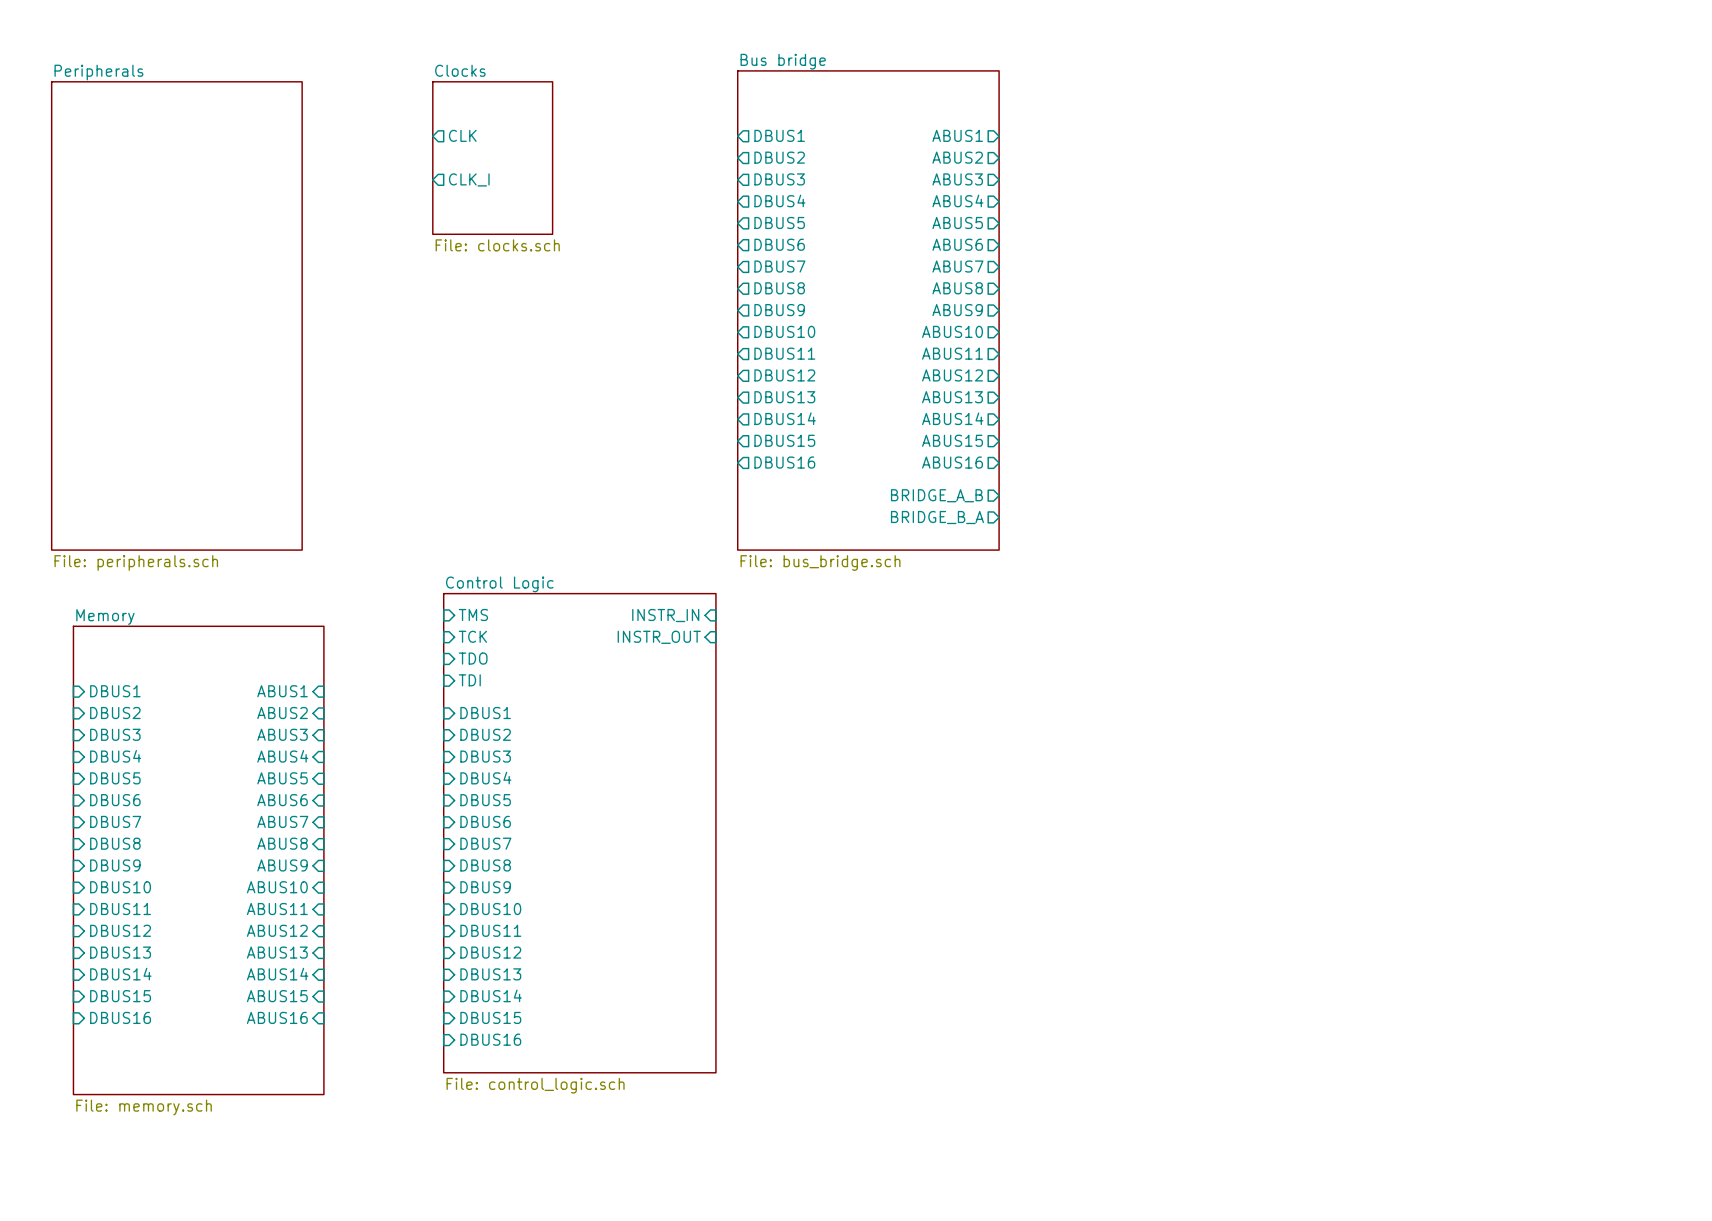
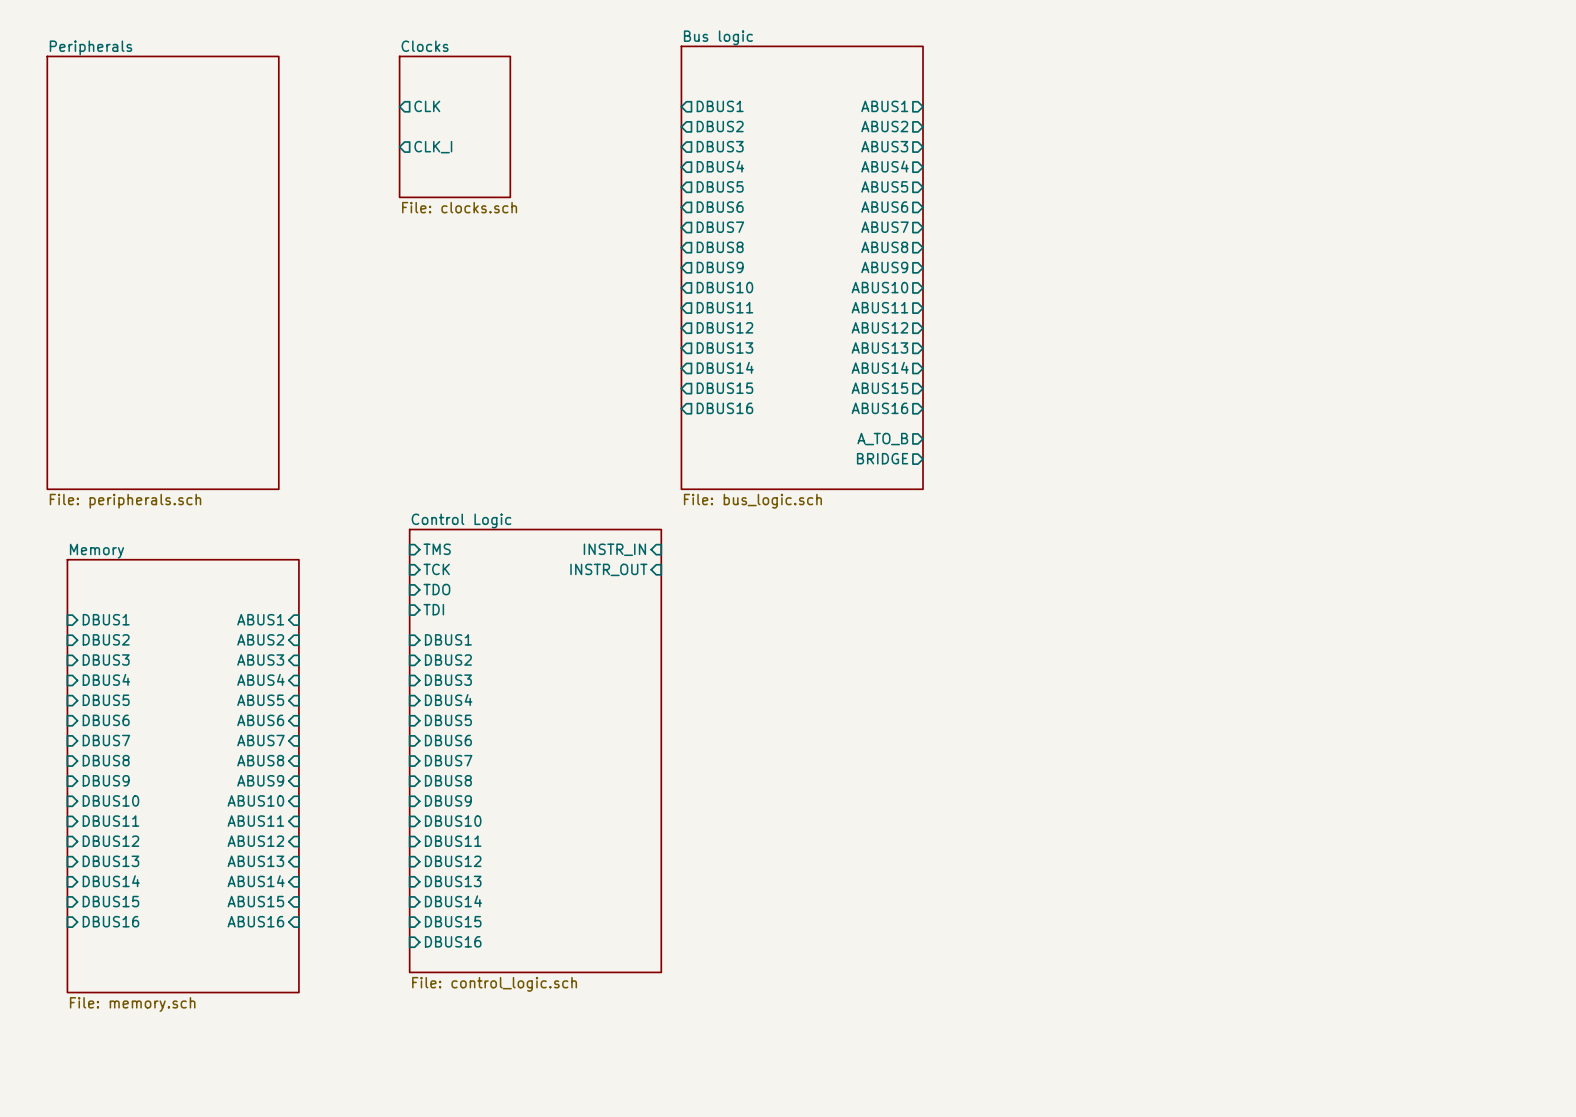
sheet Bus bridge name: Bus bridge (783, 61) -> Bus logic (718, 37)
sheet pin: BRIDGE_A_B (936, 495) -> A_TO_B (882, 439)
sheet pin: BRIDGE_B_A (937, 517) -> BRIDGE (882, 458)
sheet Bus bridge value: File: bus_bridge.sch (820, 562) -> File: bus_logic.sch (752, 501)

